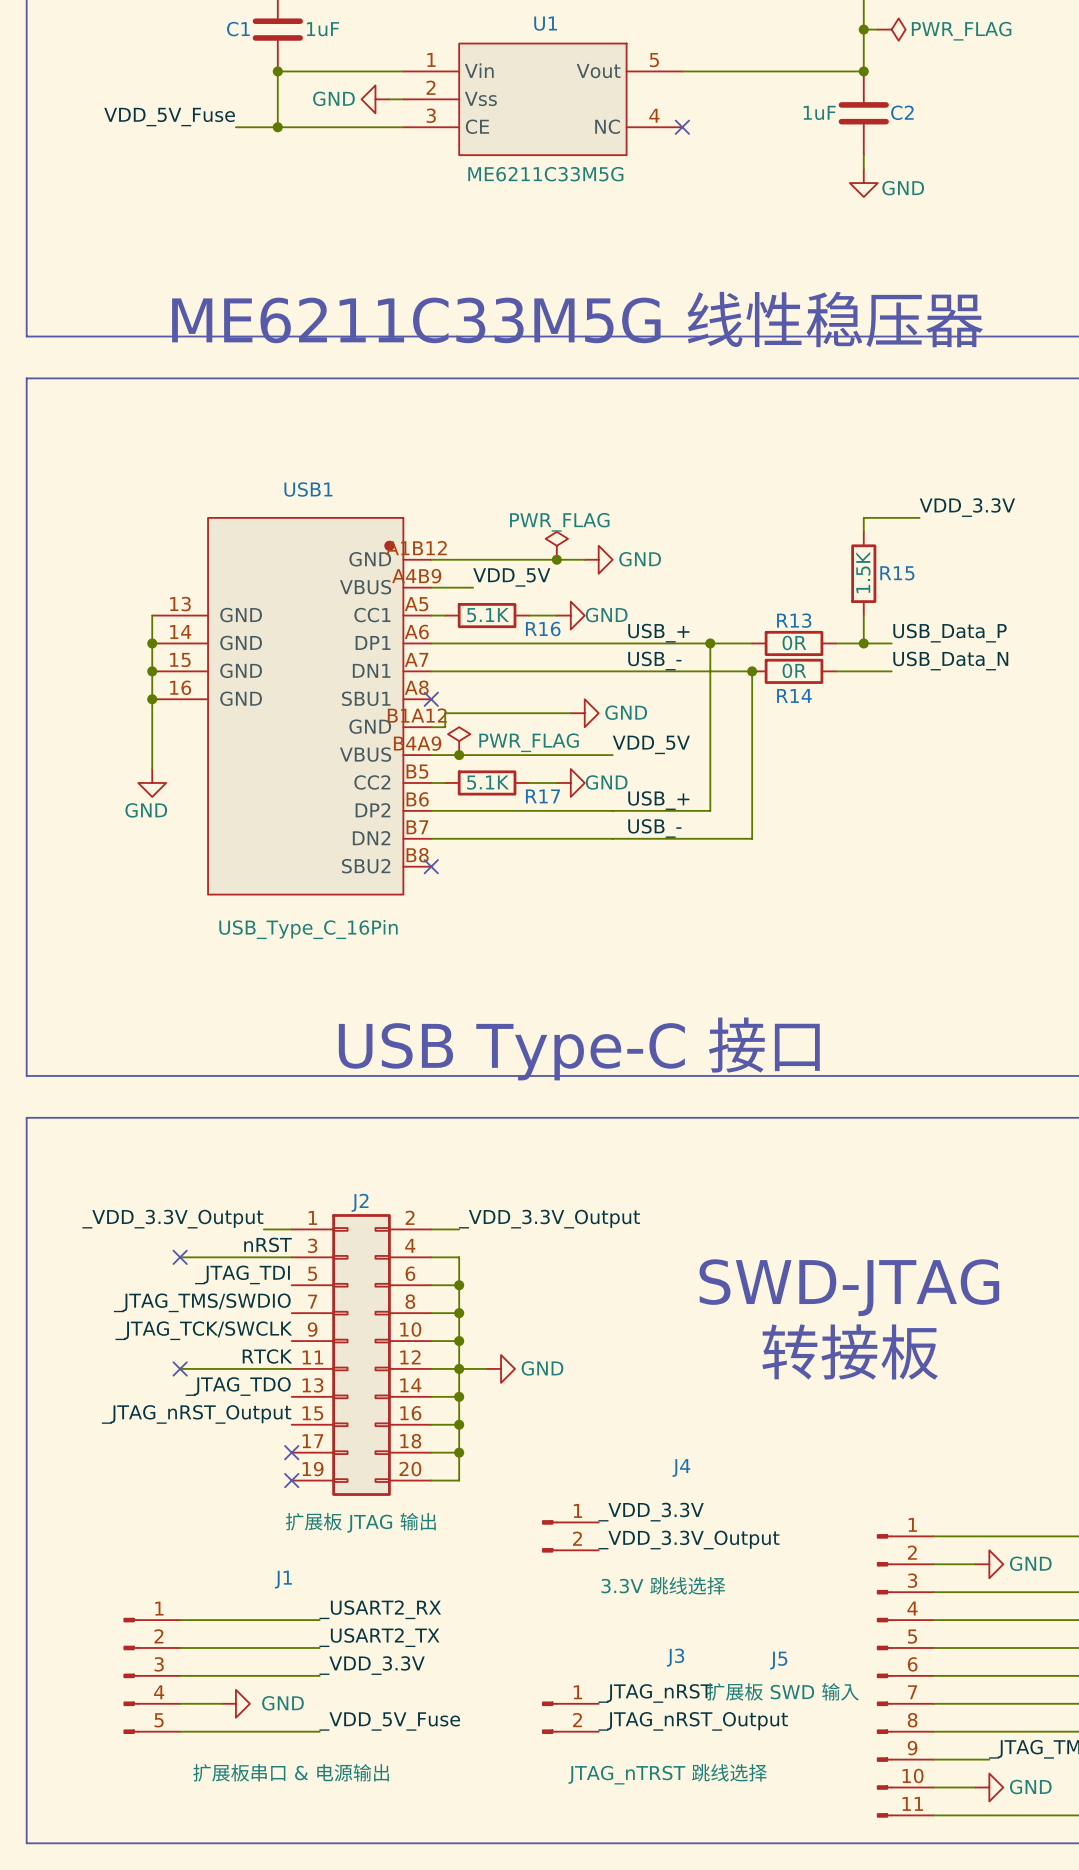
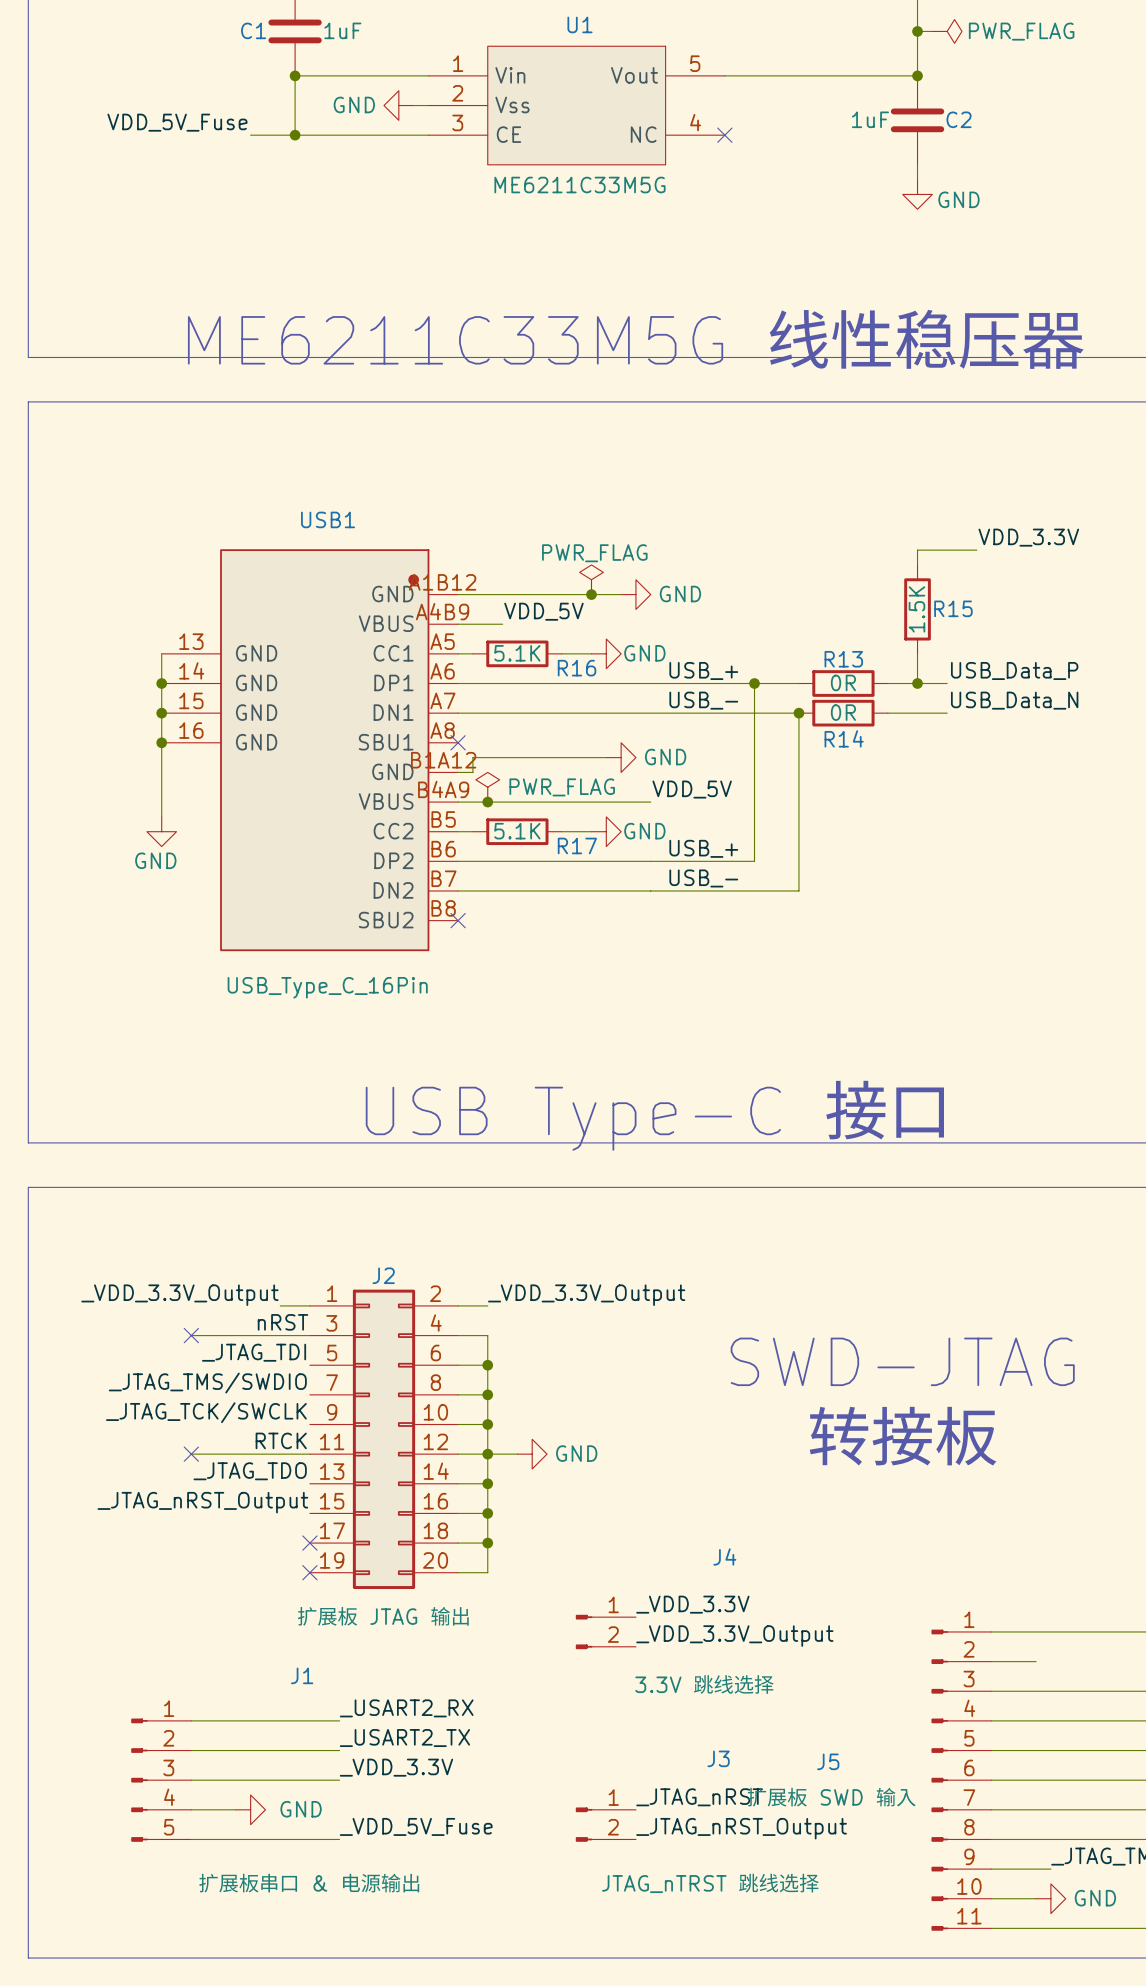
power symbol: GND (989, 1564) -> none

